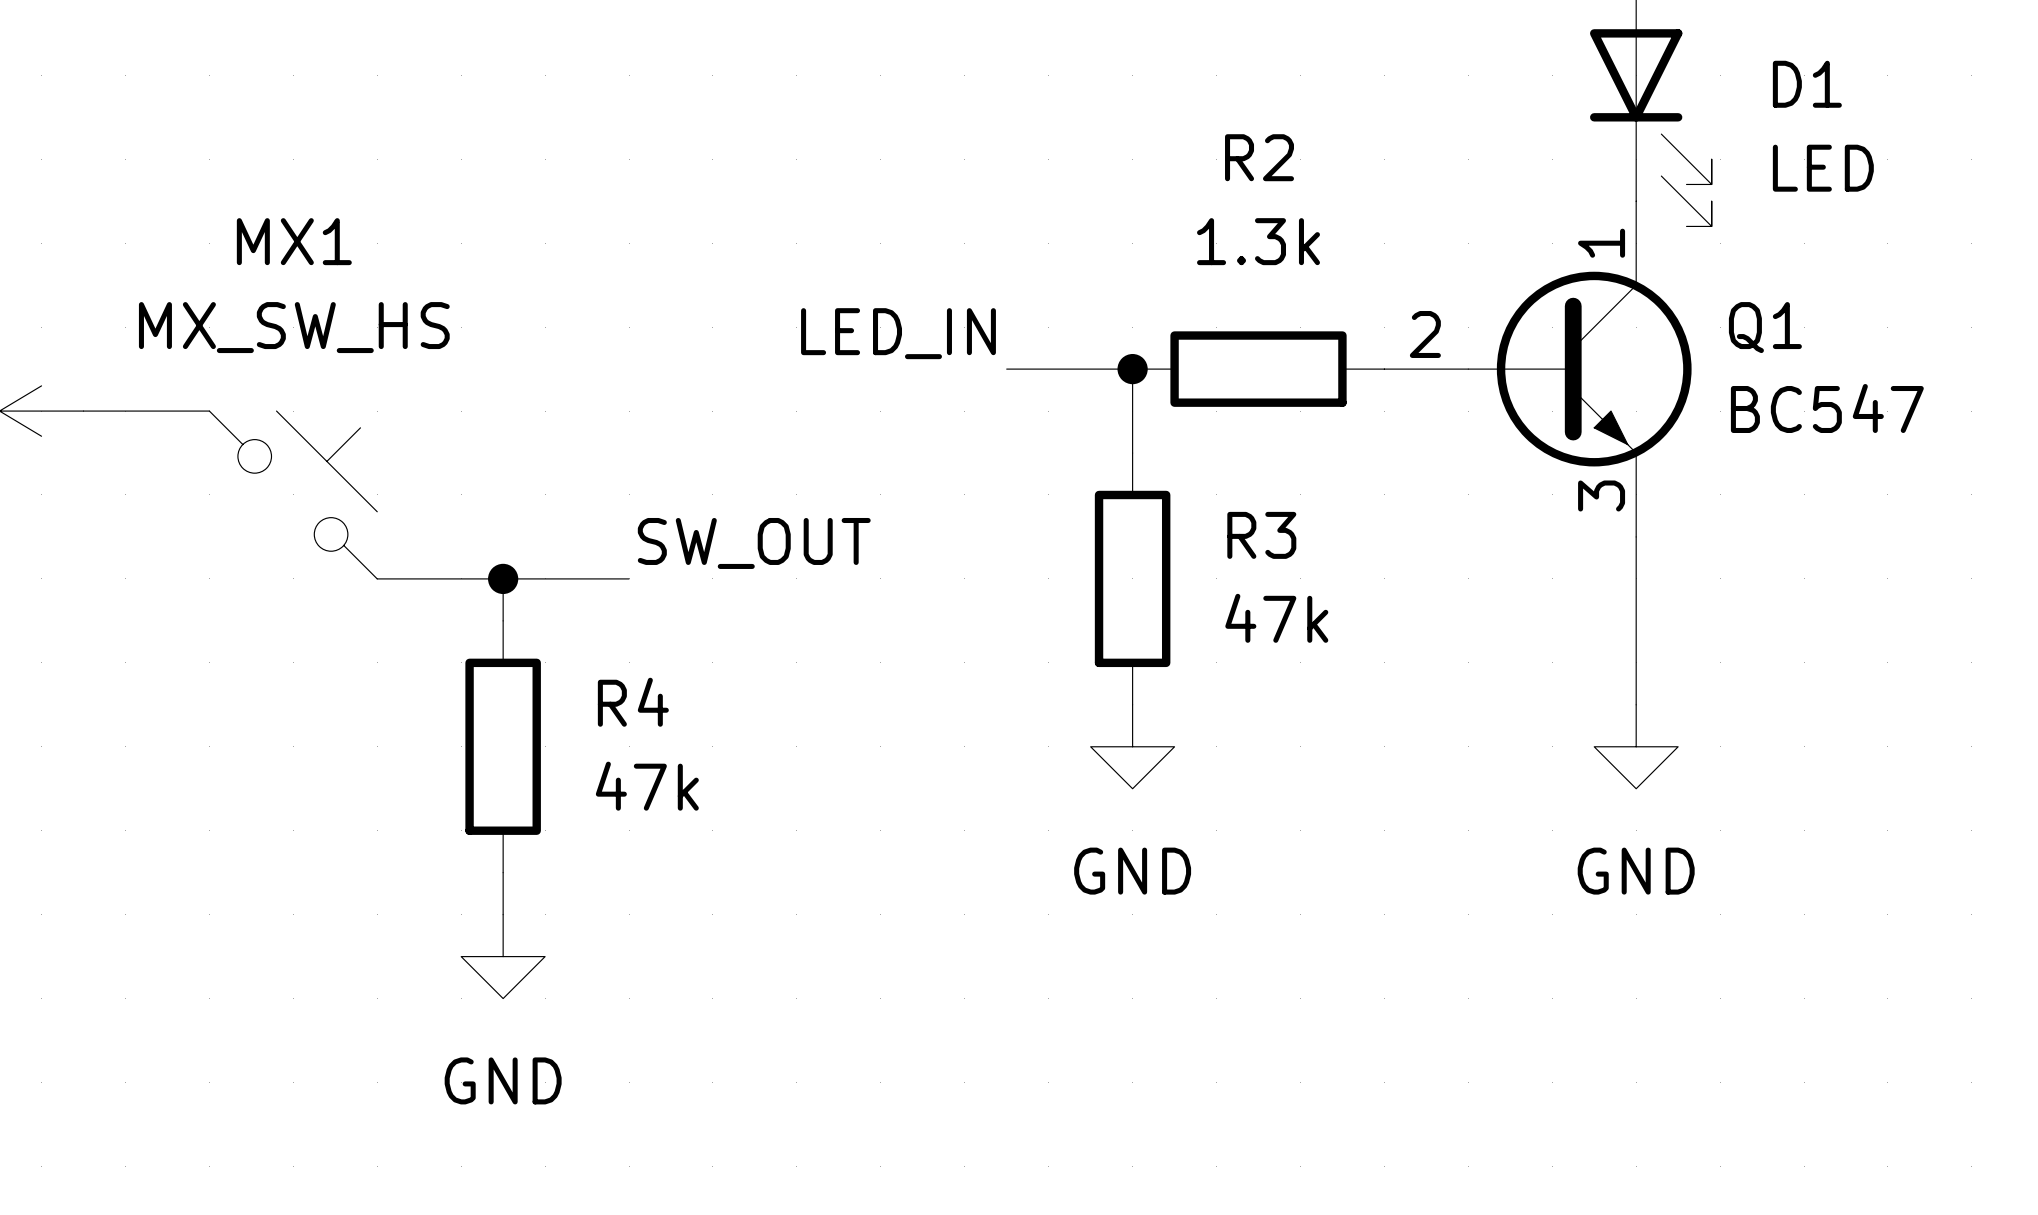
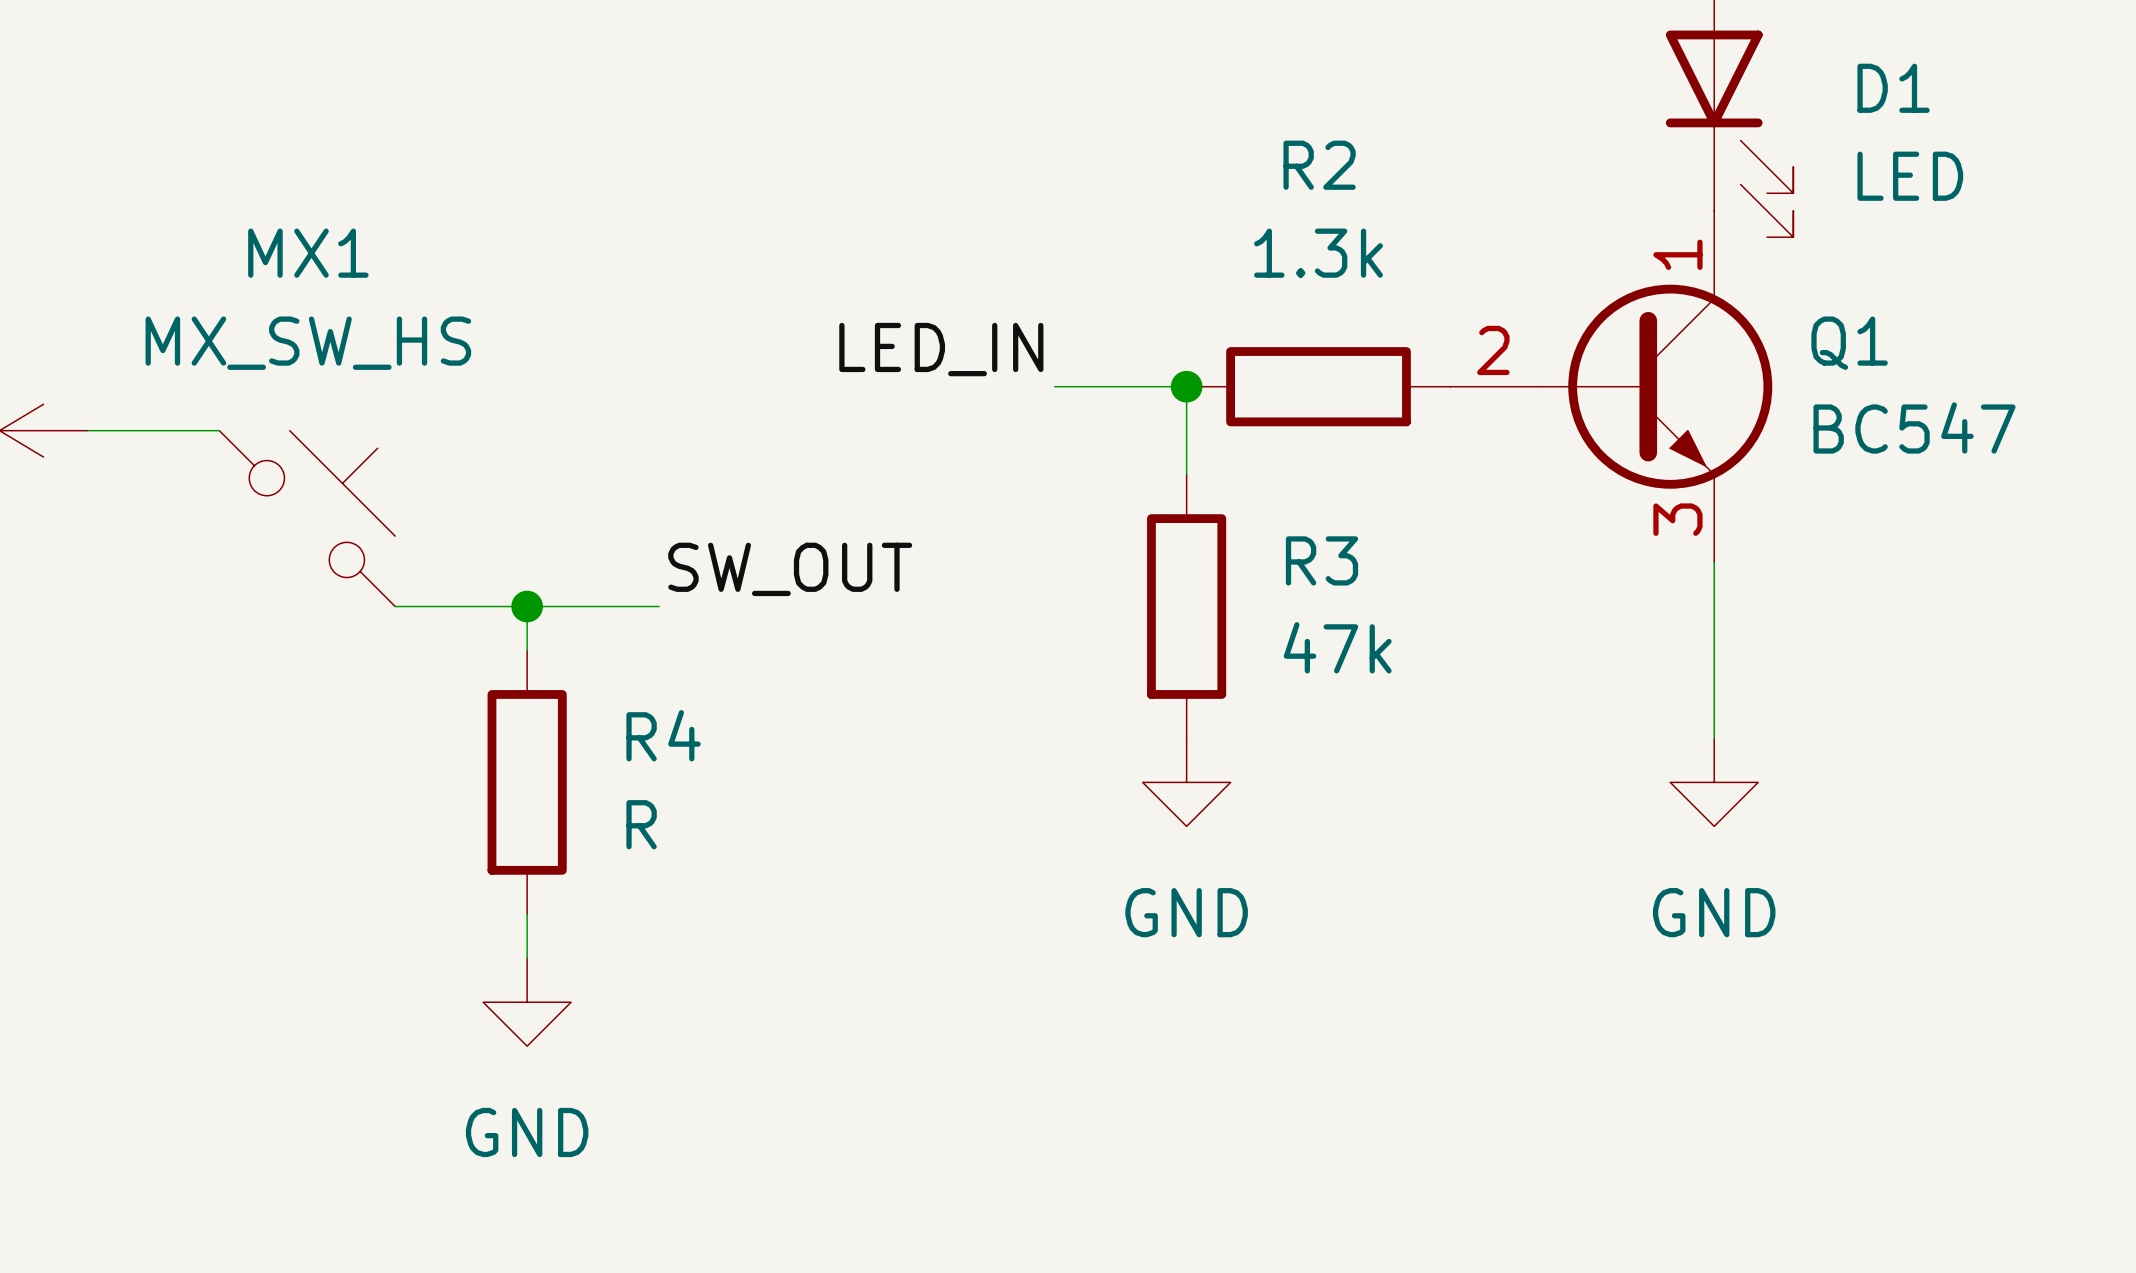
R4 value: 47k (647, 786) -> R (641, 824)

